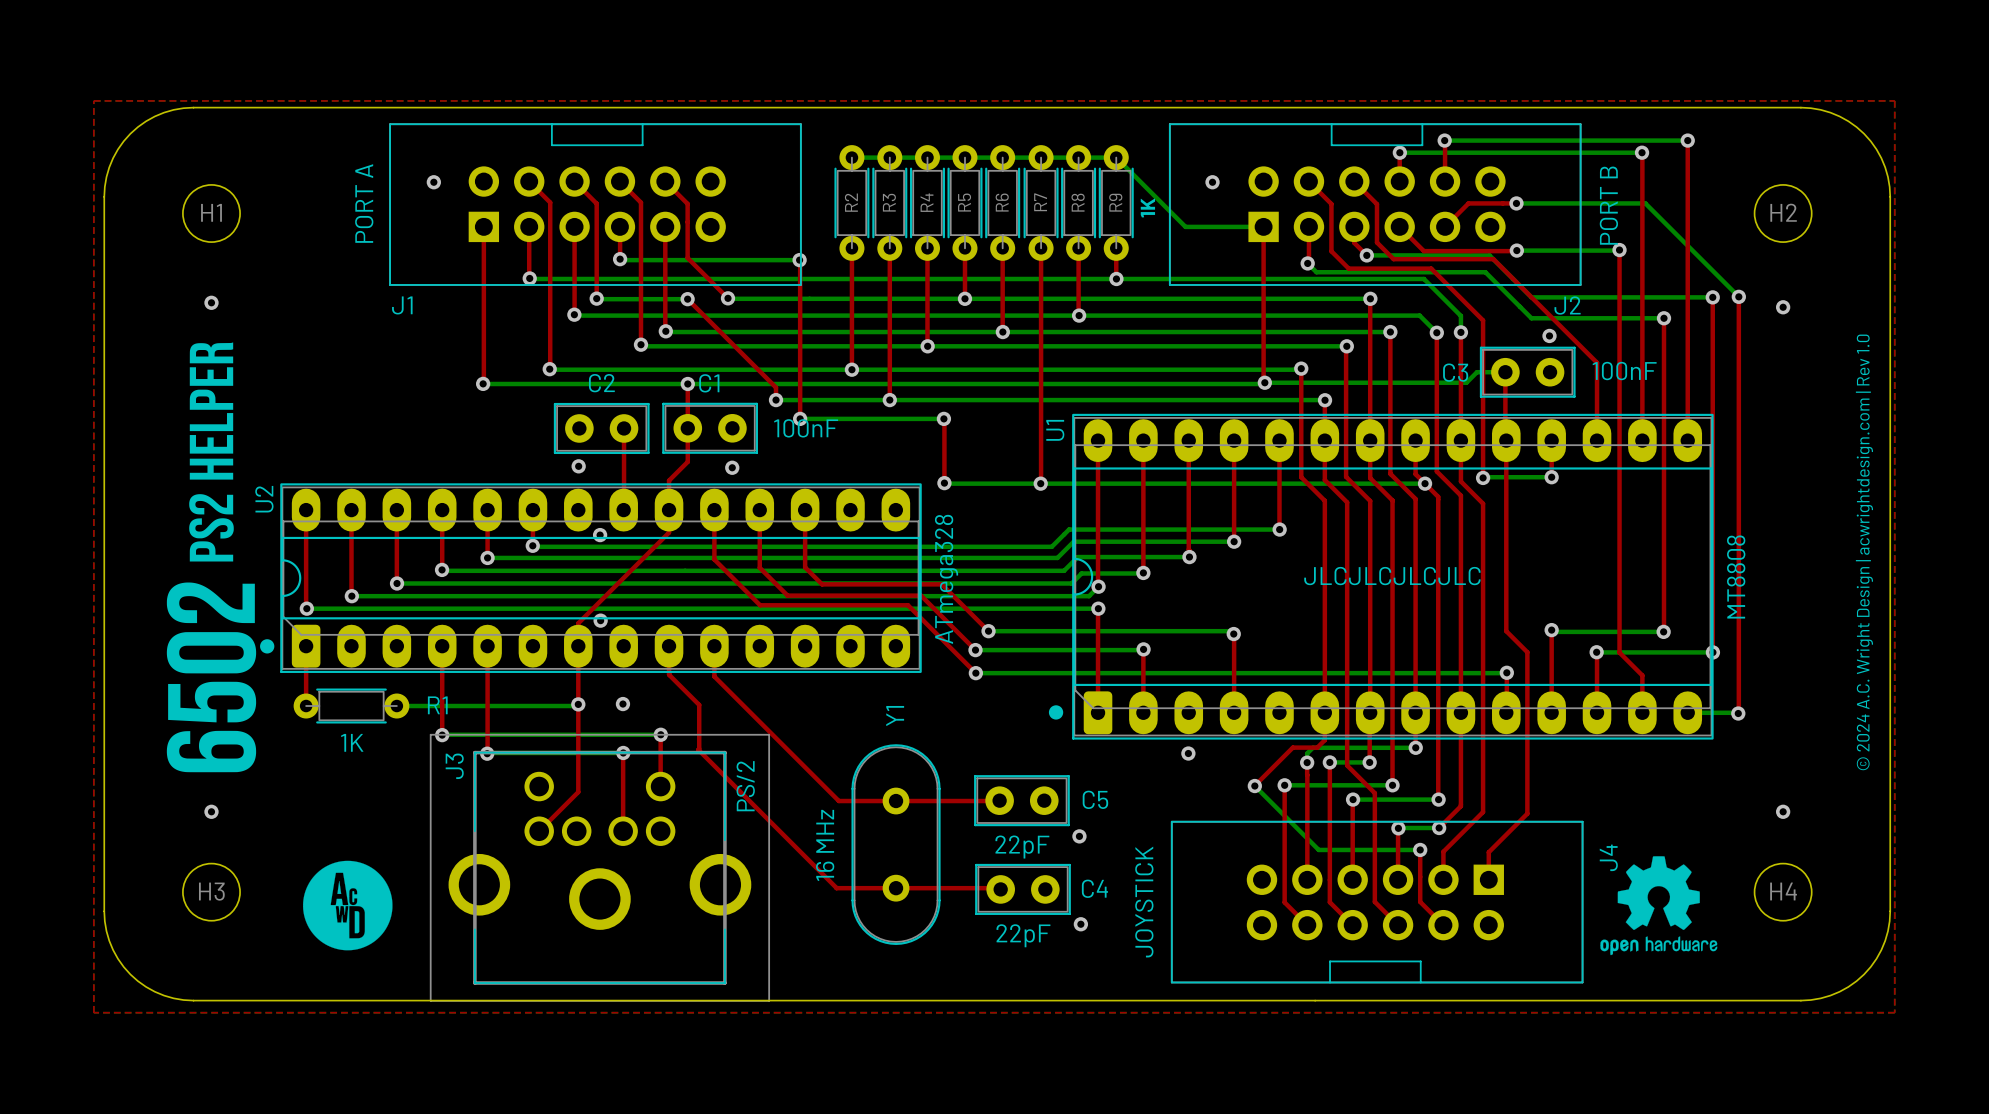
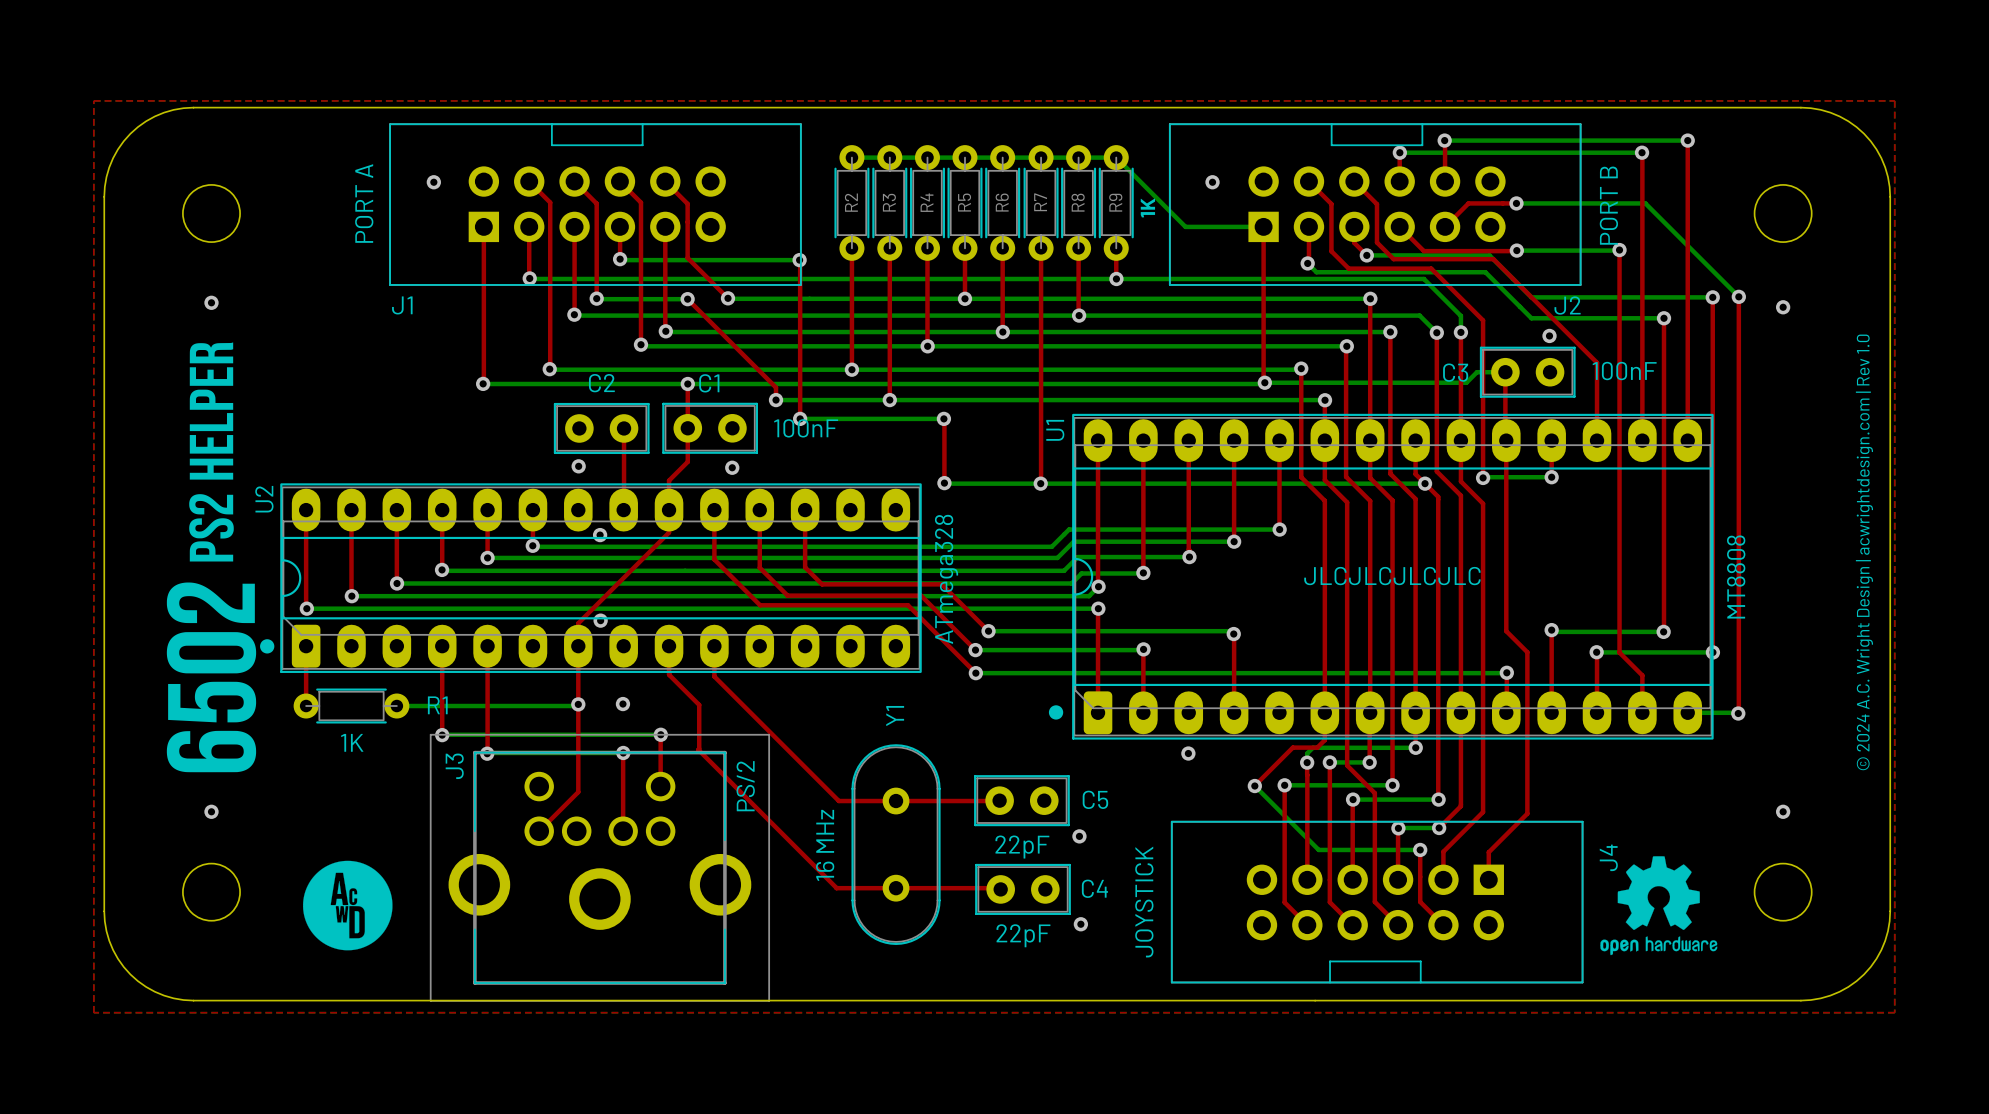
H1 name: H1 (211, 212) -> none
H2 name: H2 (1783, 212) -> none
H3 name: H3 (211, 891) -> none
H4 name: H4 (1783, 891) -> none

